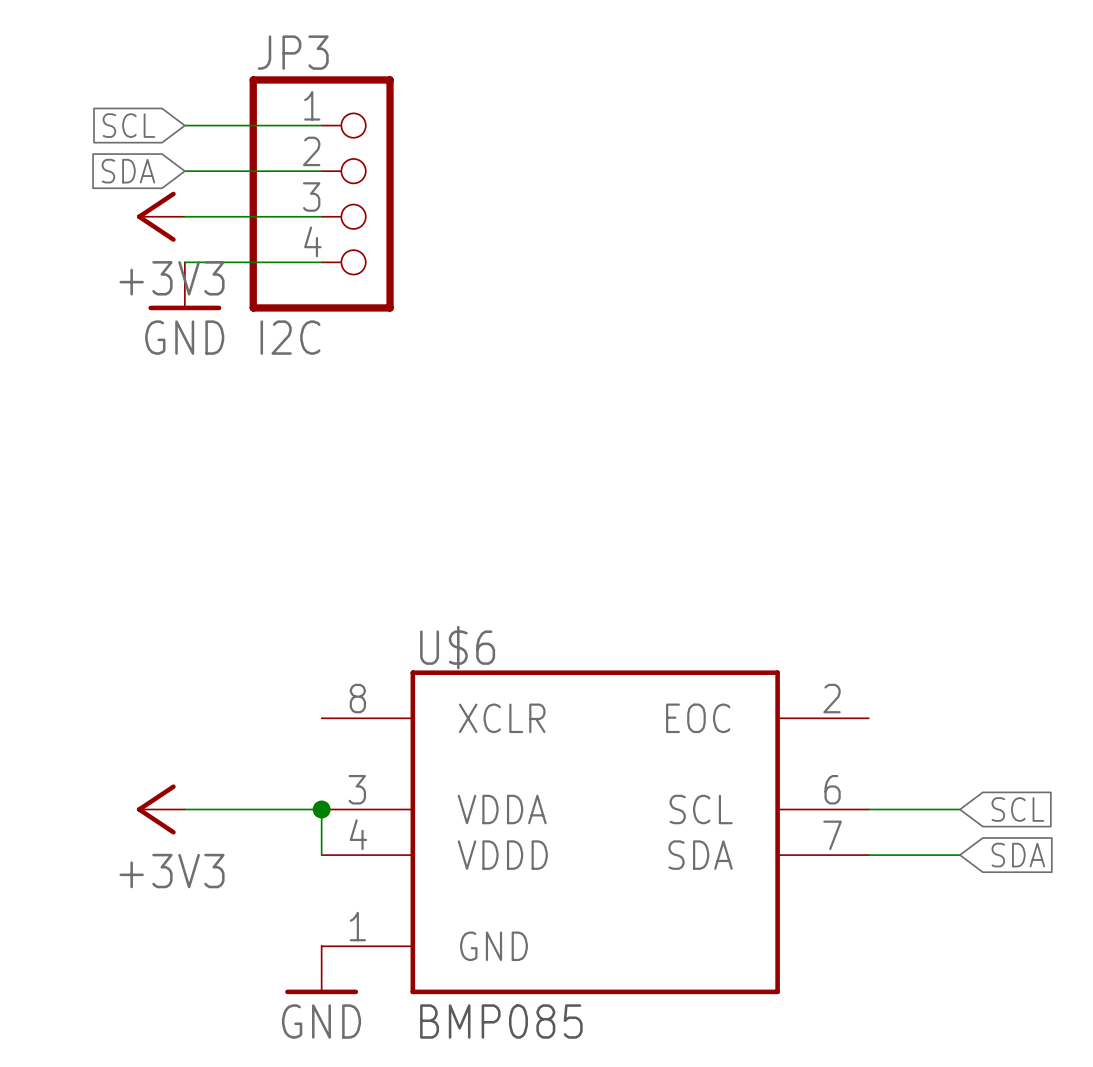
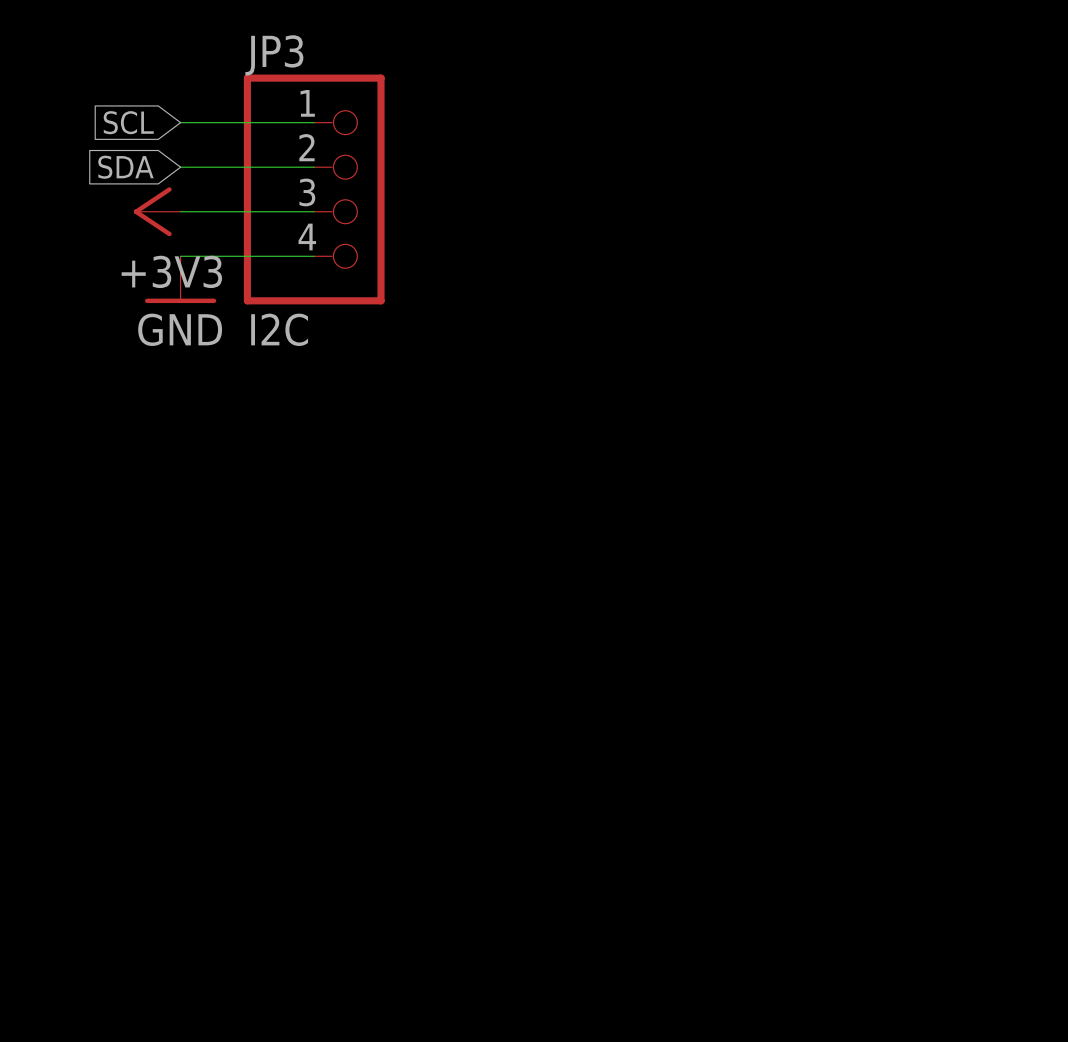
power symbol: +3V3 (160, 809) -> none
wire: (184, 809) (321, 809) (321, 855) -> none
junction: (321, 809) -> none
wire: (868, 809) (959, 809) -> none
global label: SCL (1017, 809) -> none
U$6: (595, 832) -> none
wire: (868, 855) (959, 855) -> none
global label: SDA (1018, 855) -> none
power symbol: GND (321, 970) -> none

